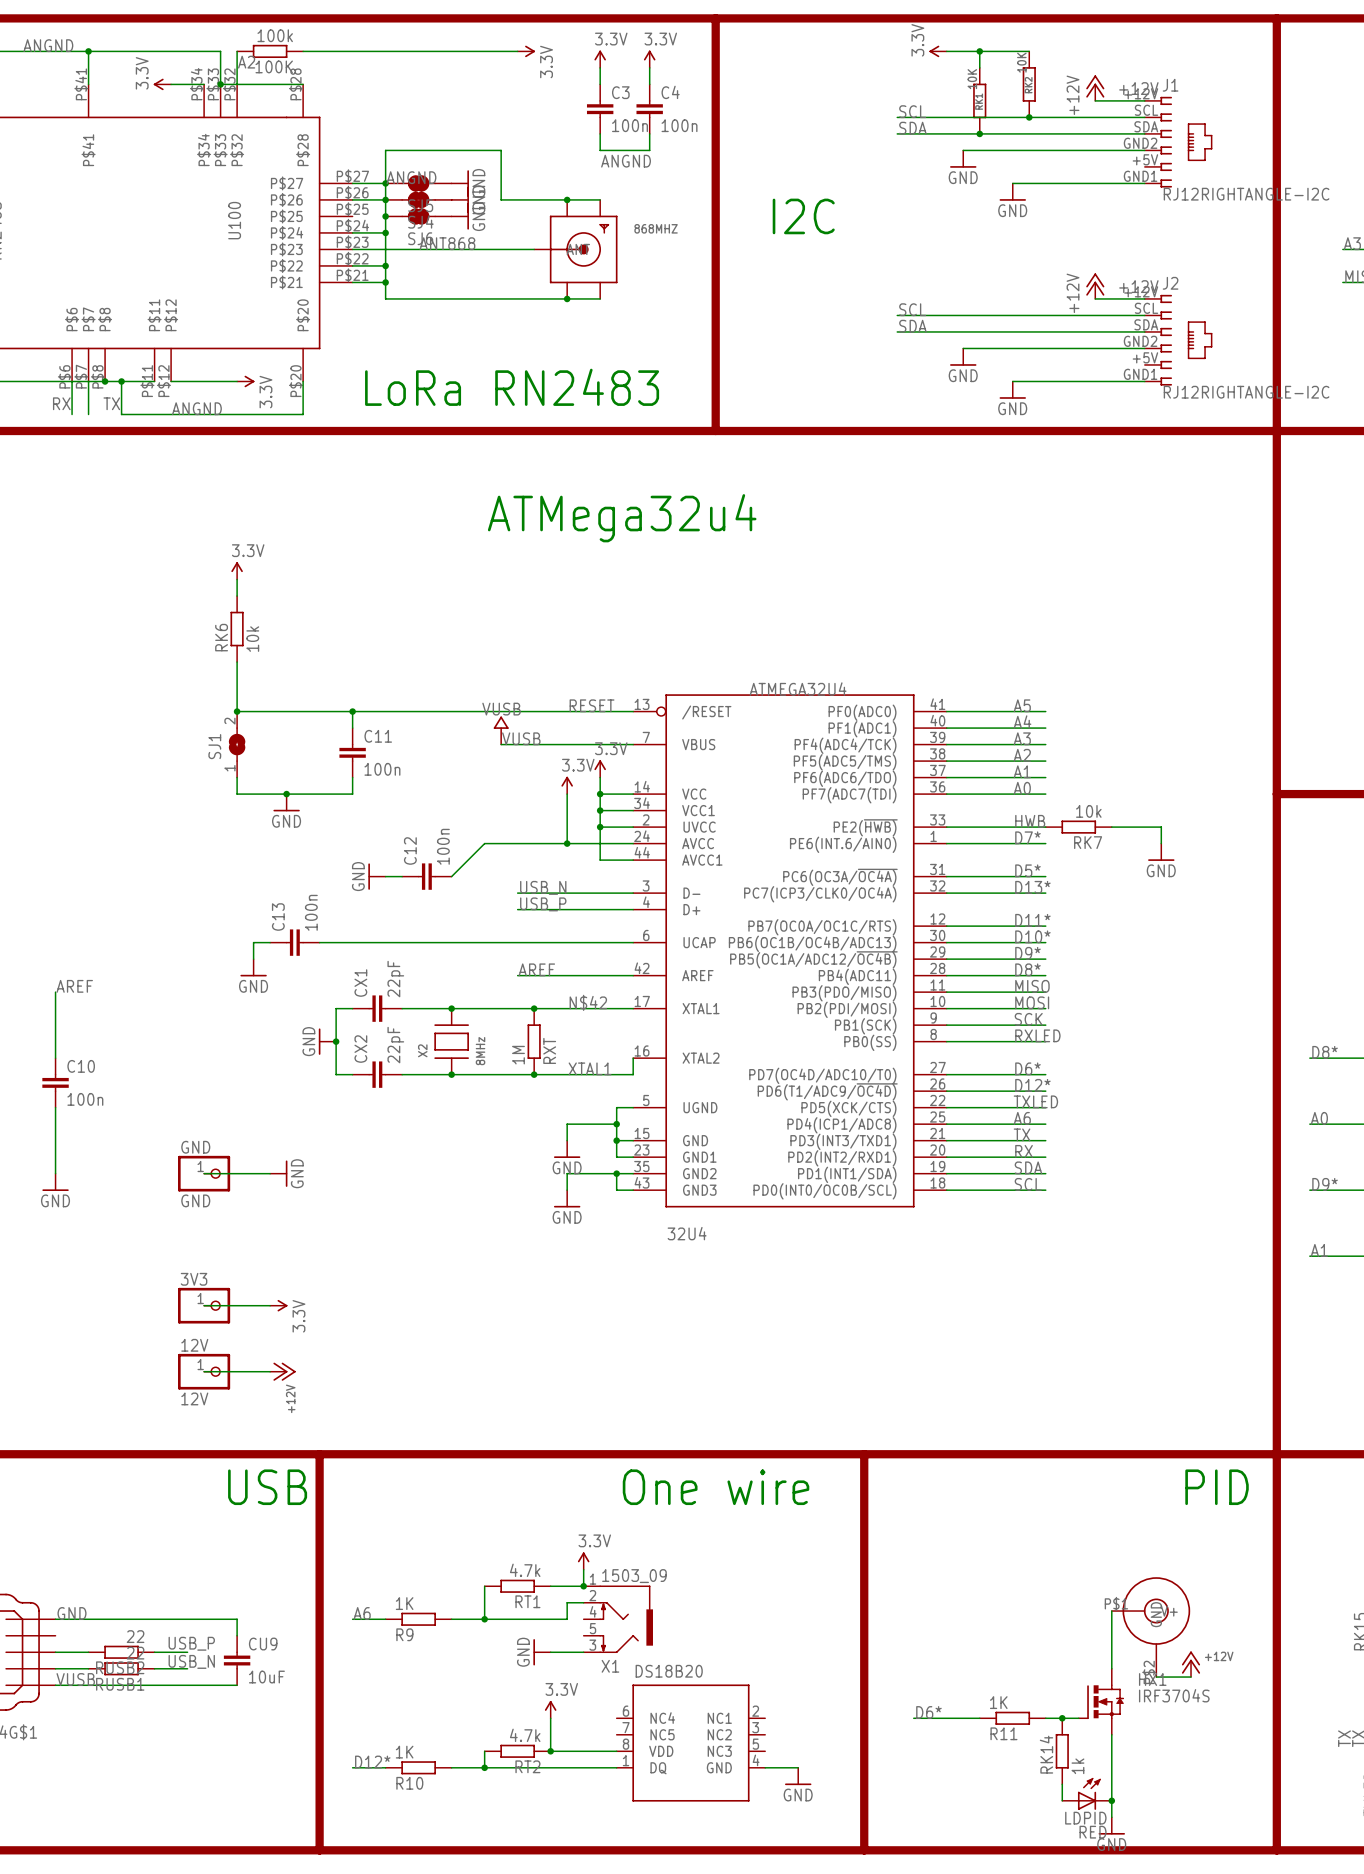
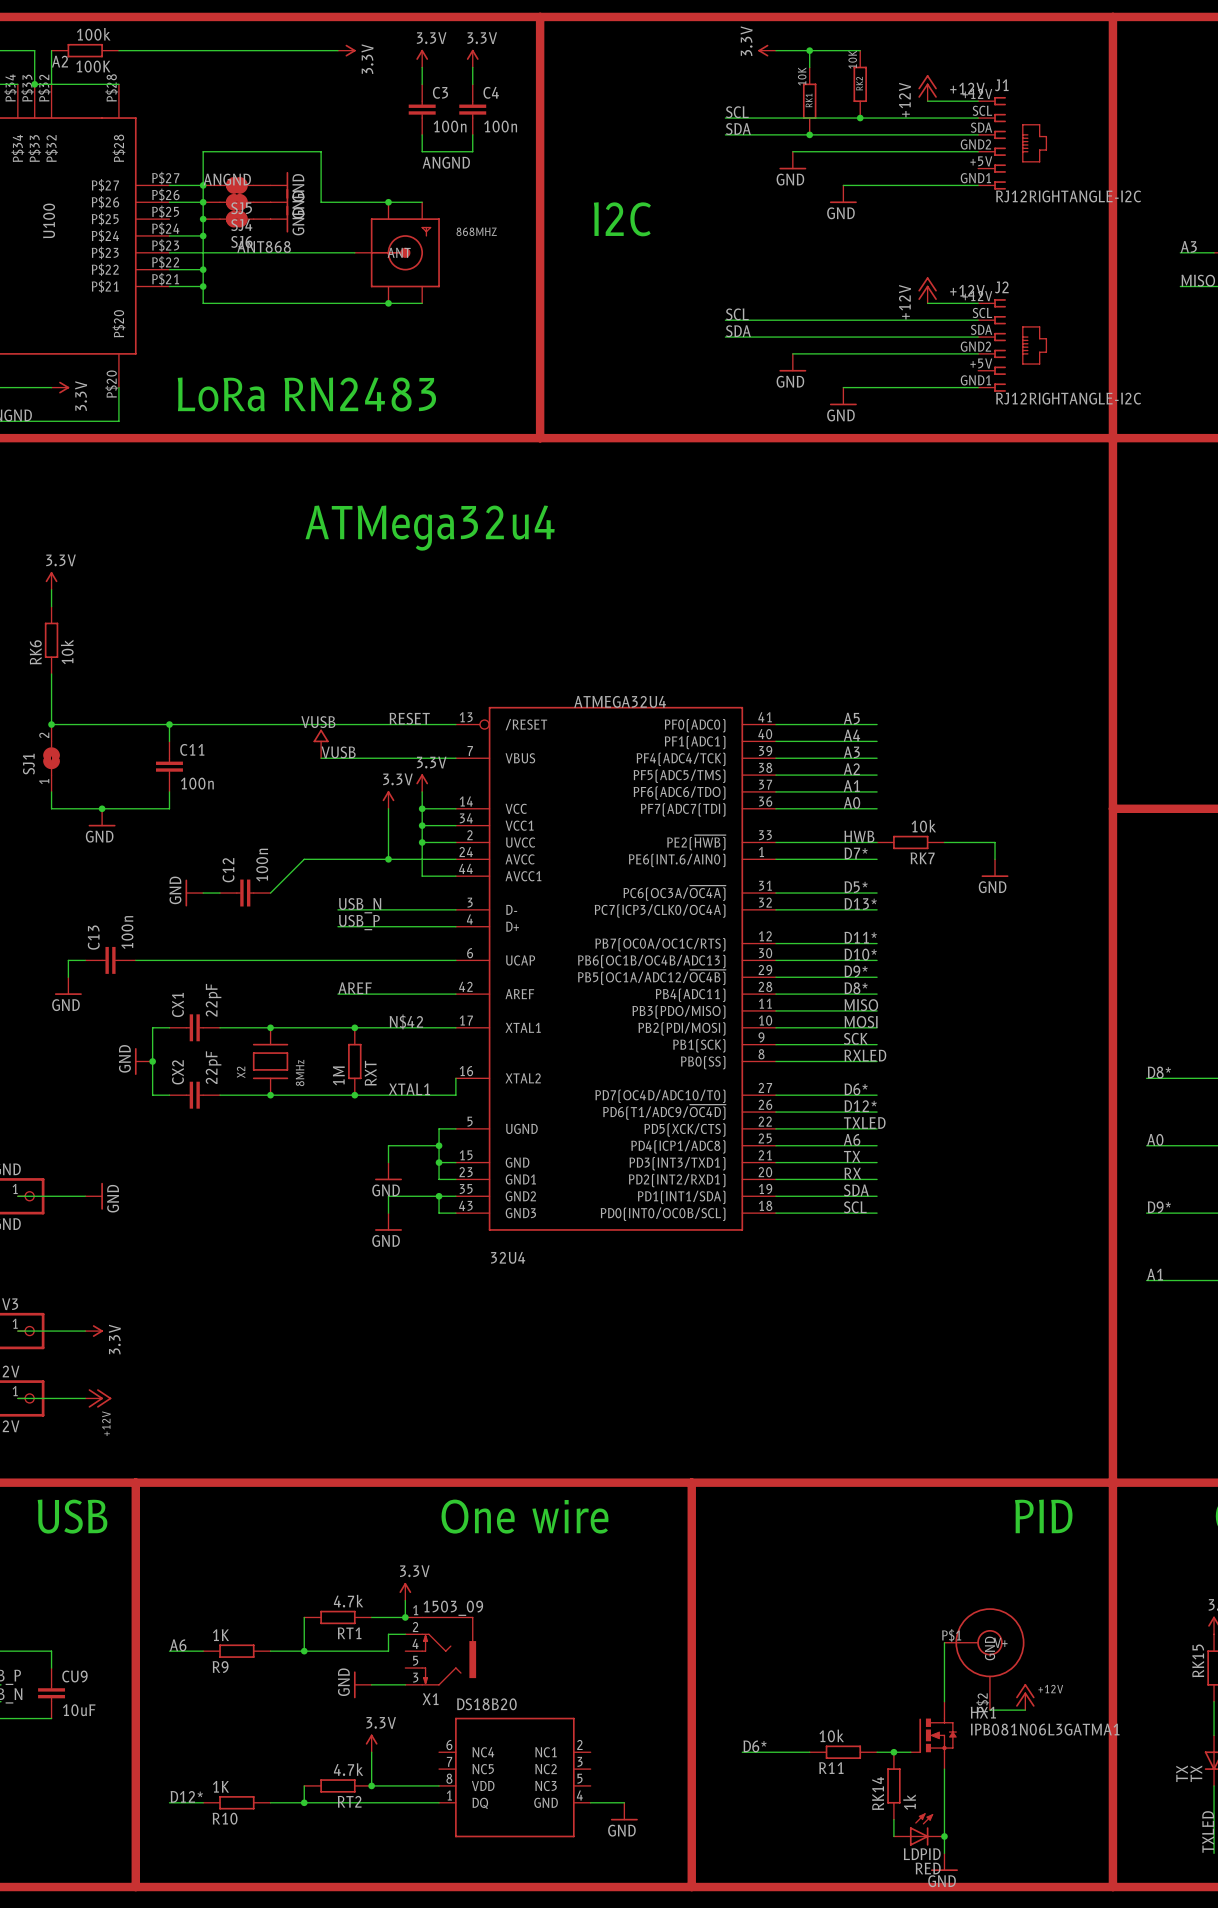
HX1 value: IRF3704S (1174, 1695) -> IPB081N06L3GATMA1 (1045, 1729)
R11 value: 1K (998, 1702) -> 10k (831, 1735)

